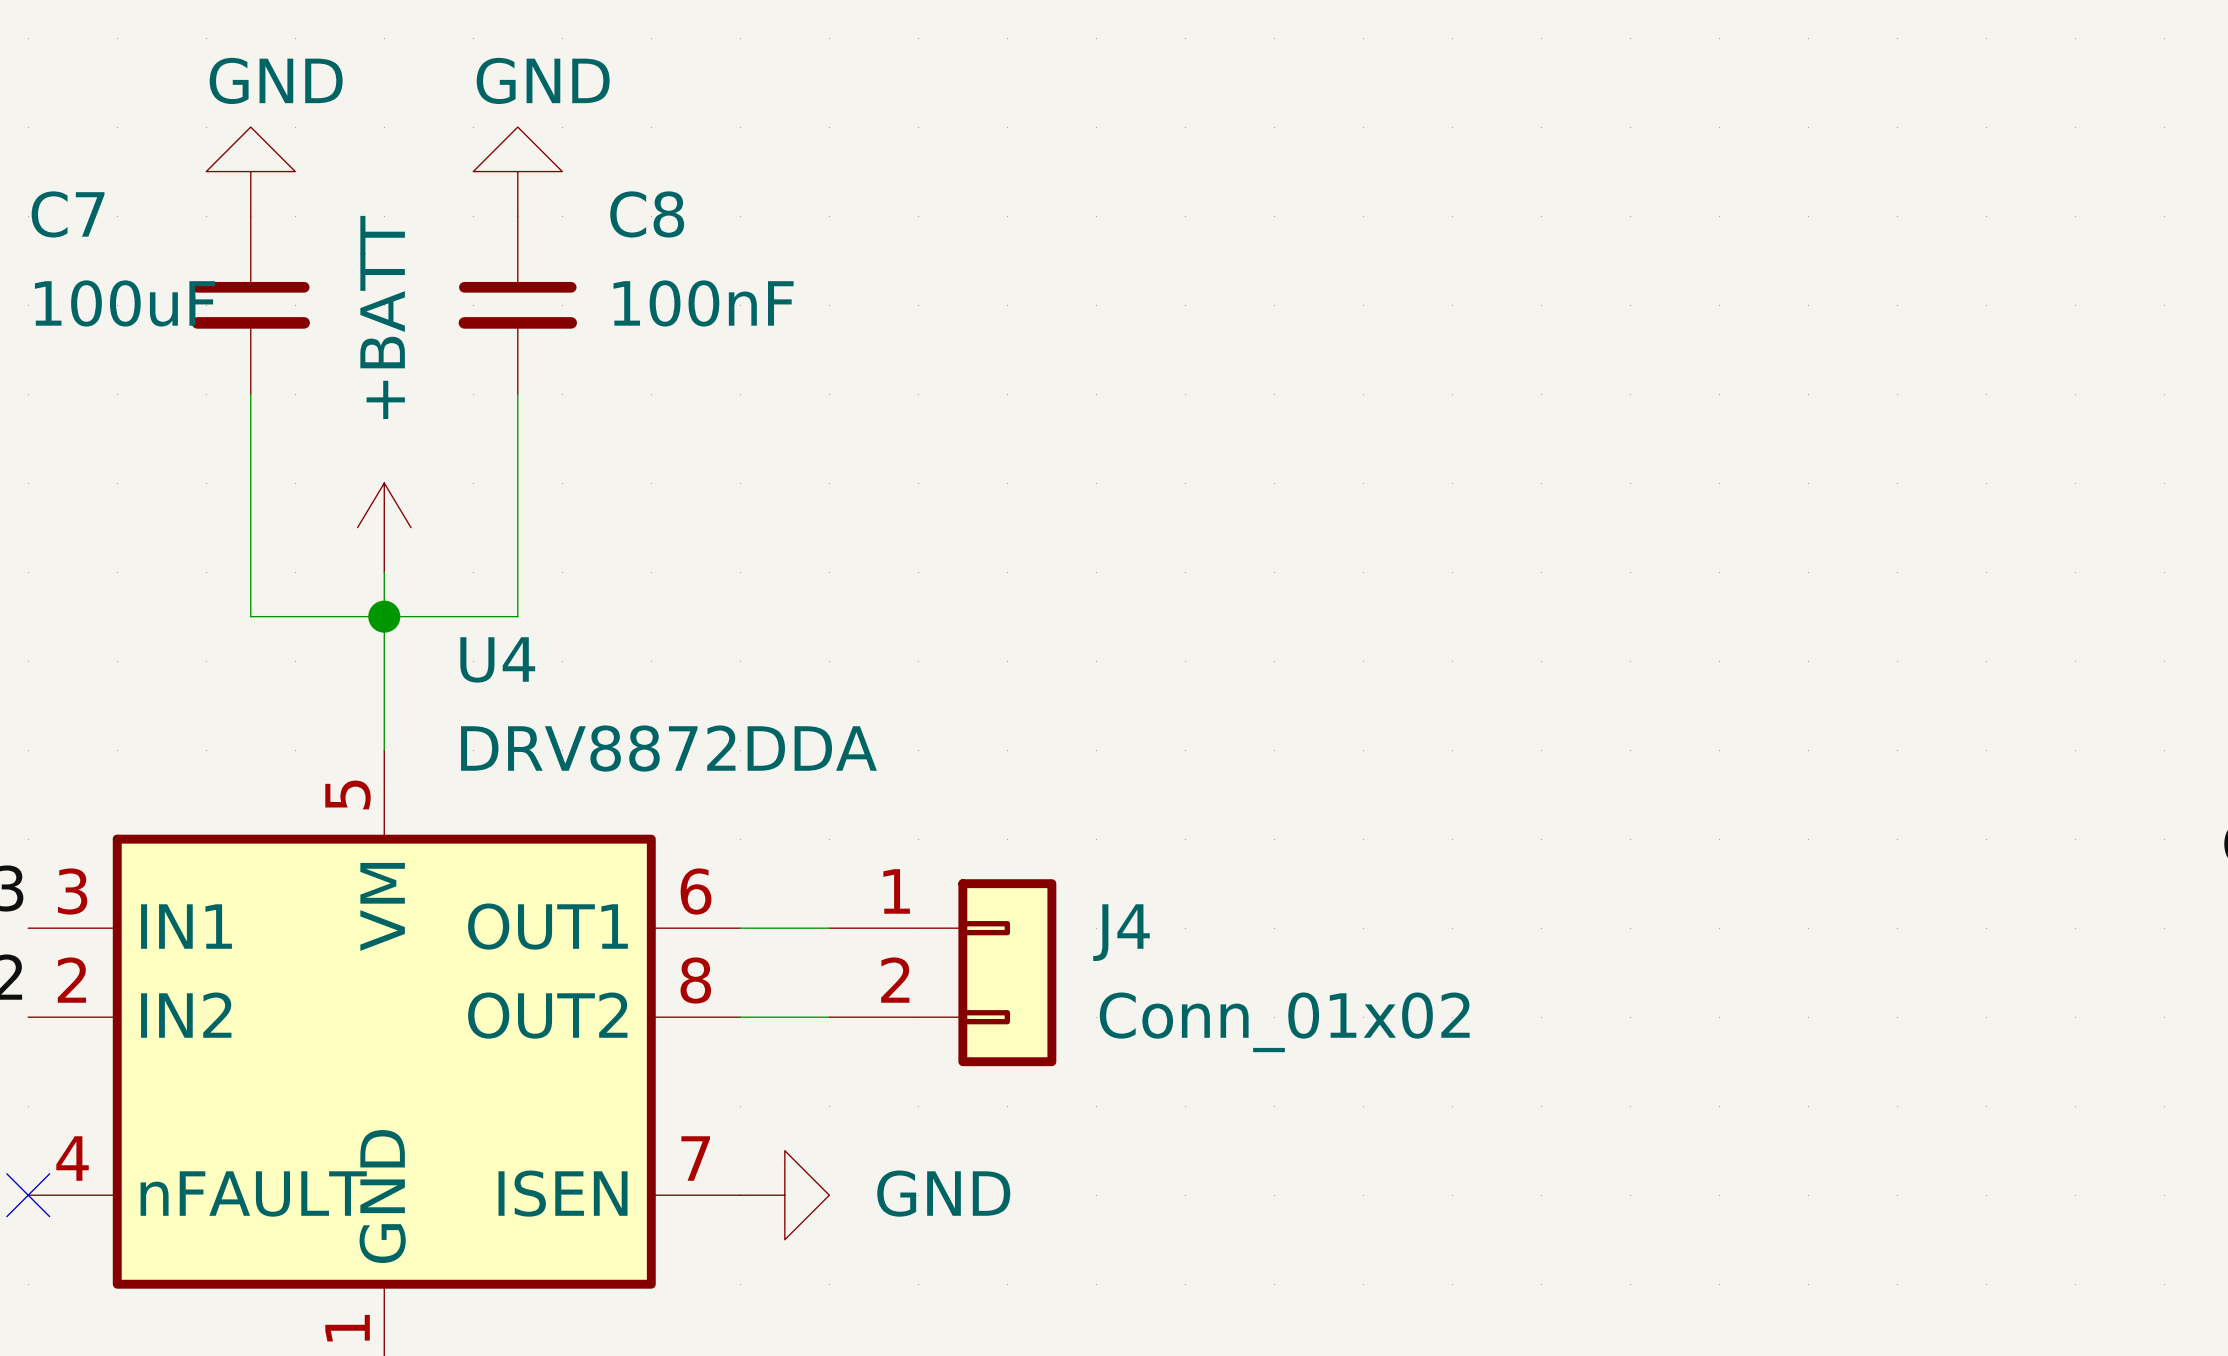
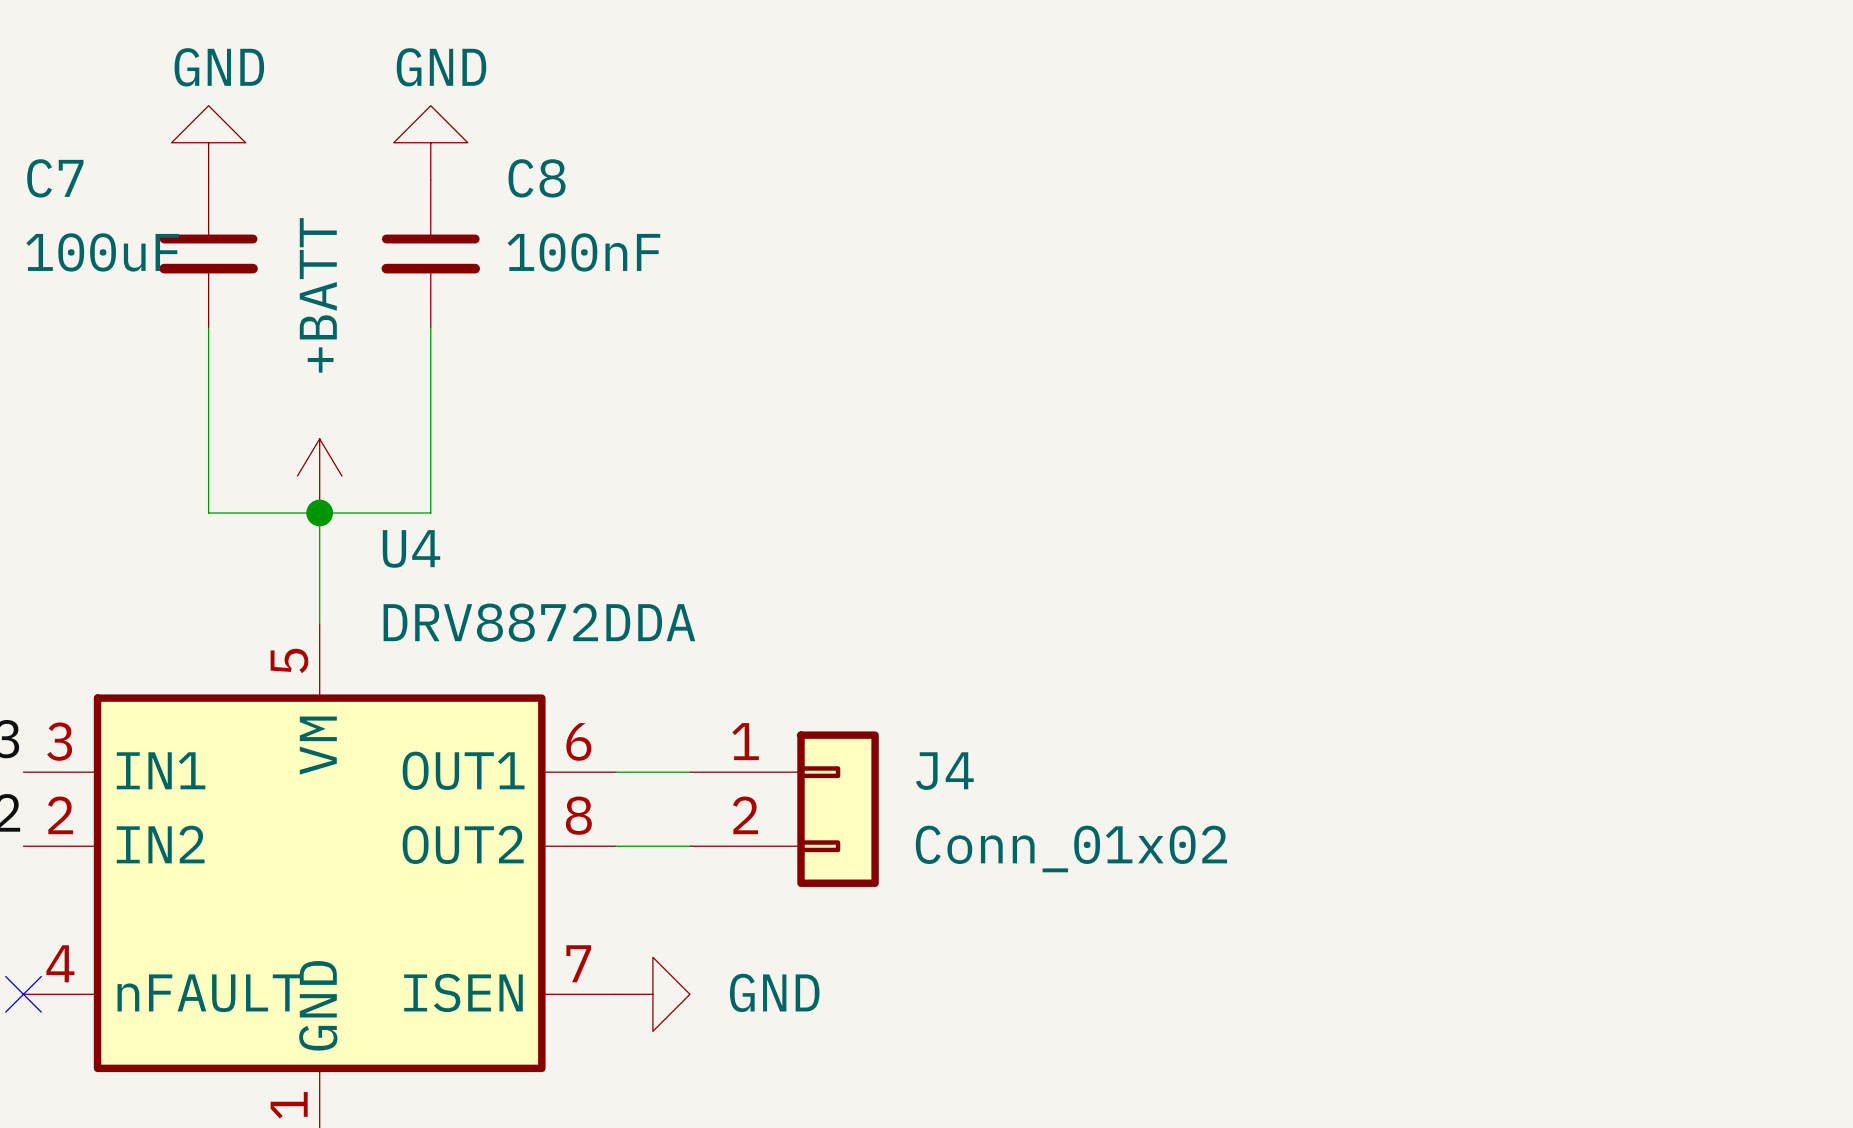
power symbol position: +BATT (384, 527) -> +BATT (319, 475)

